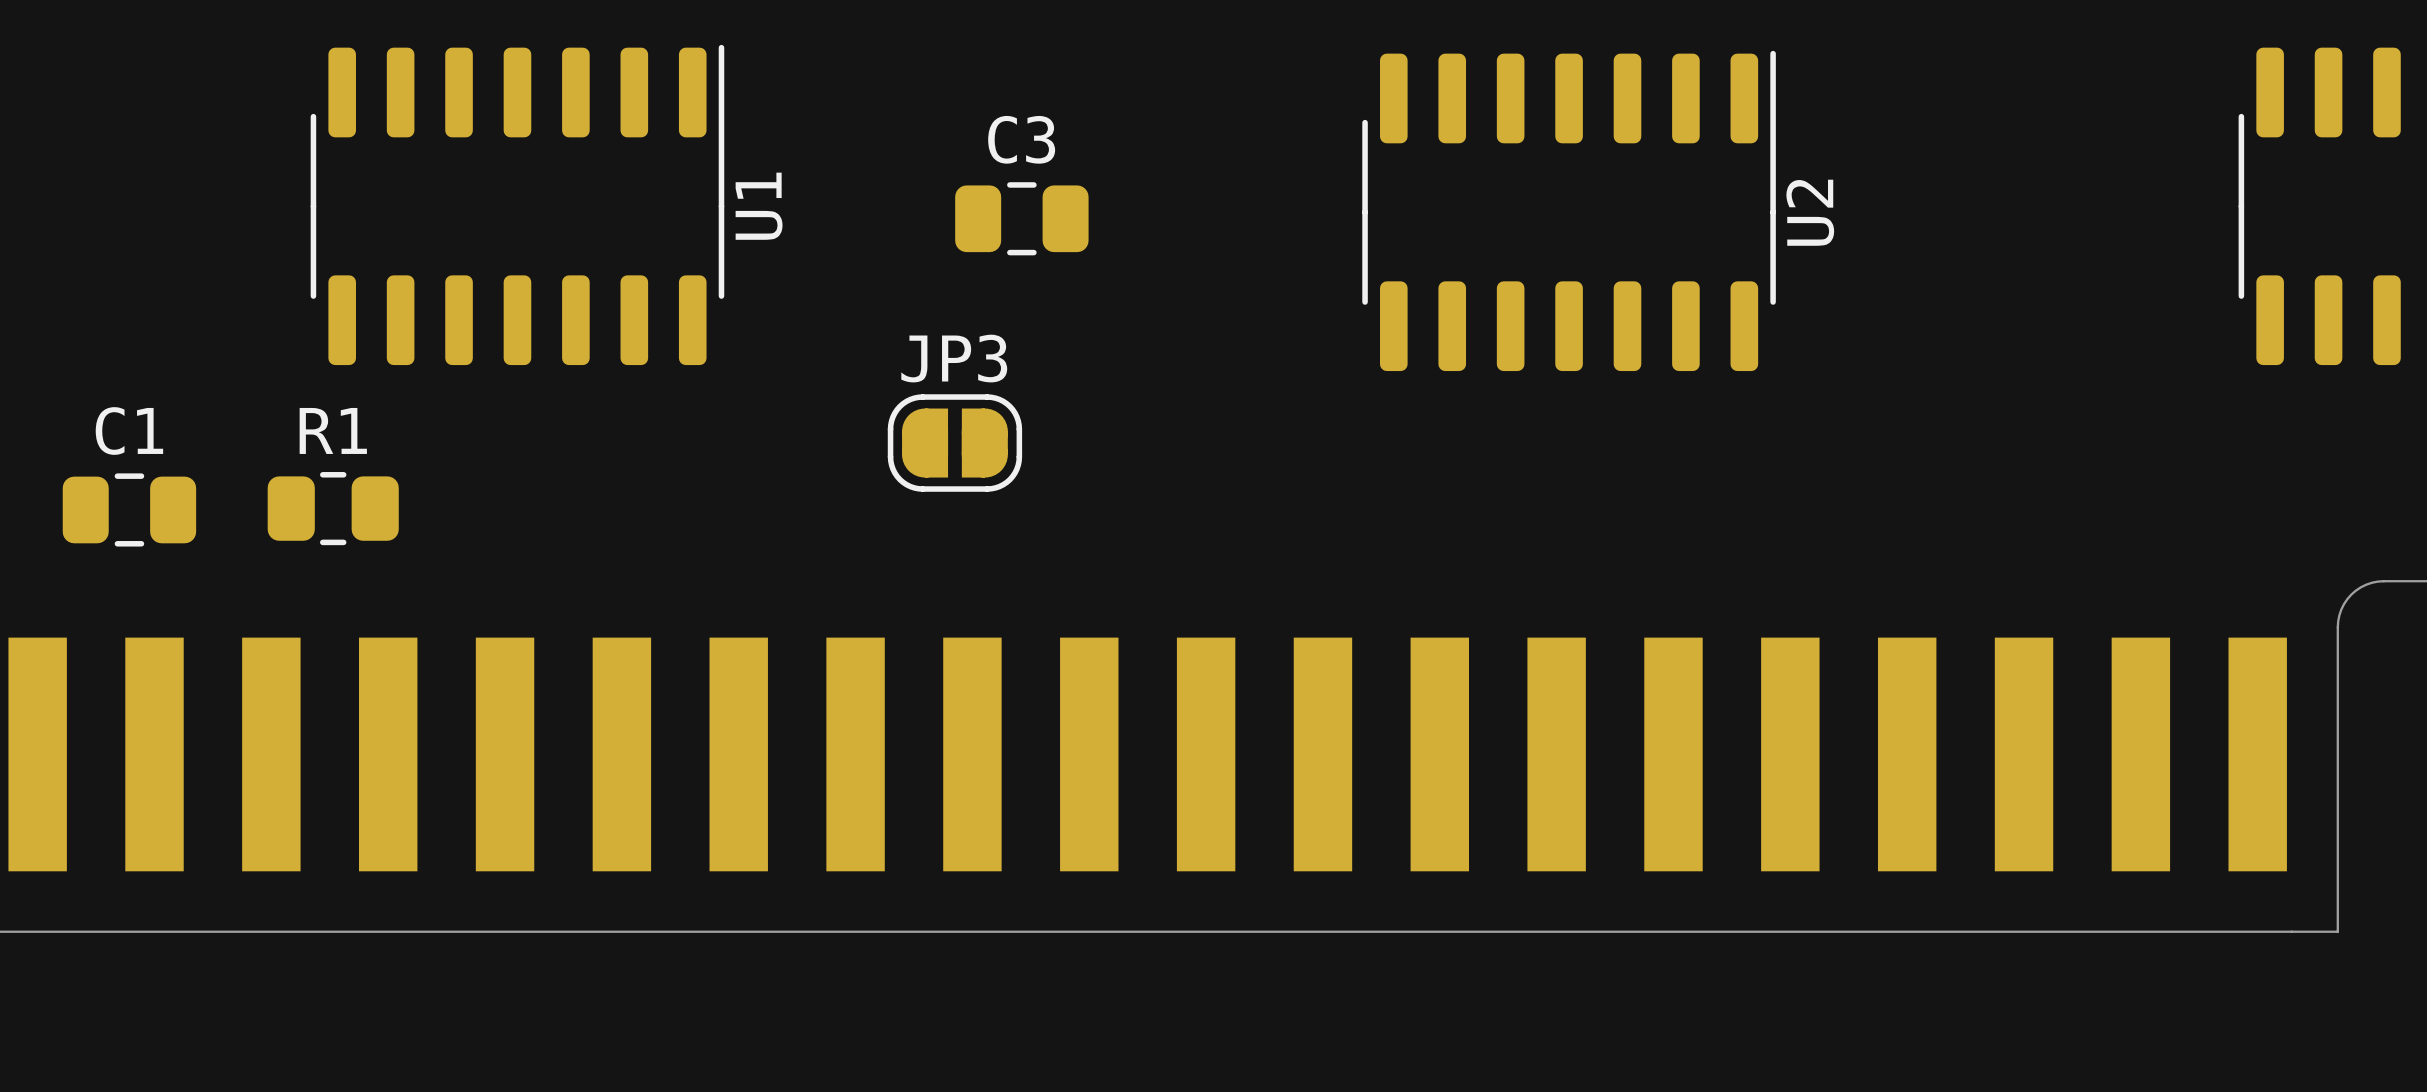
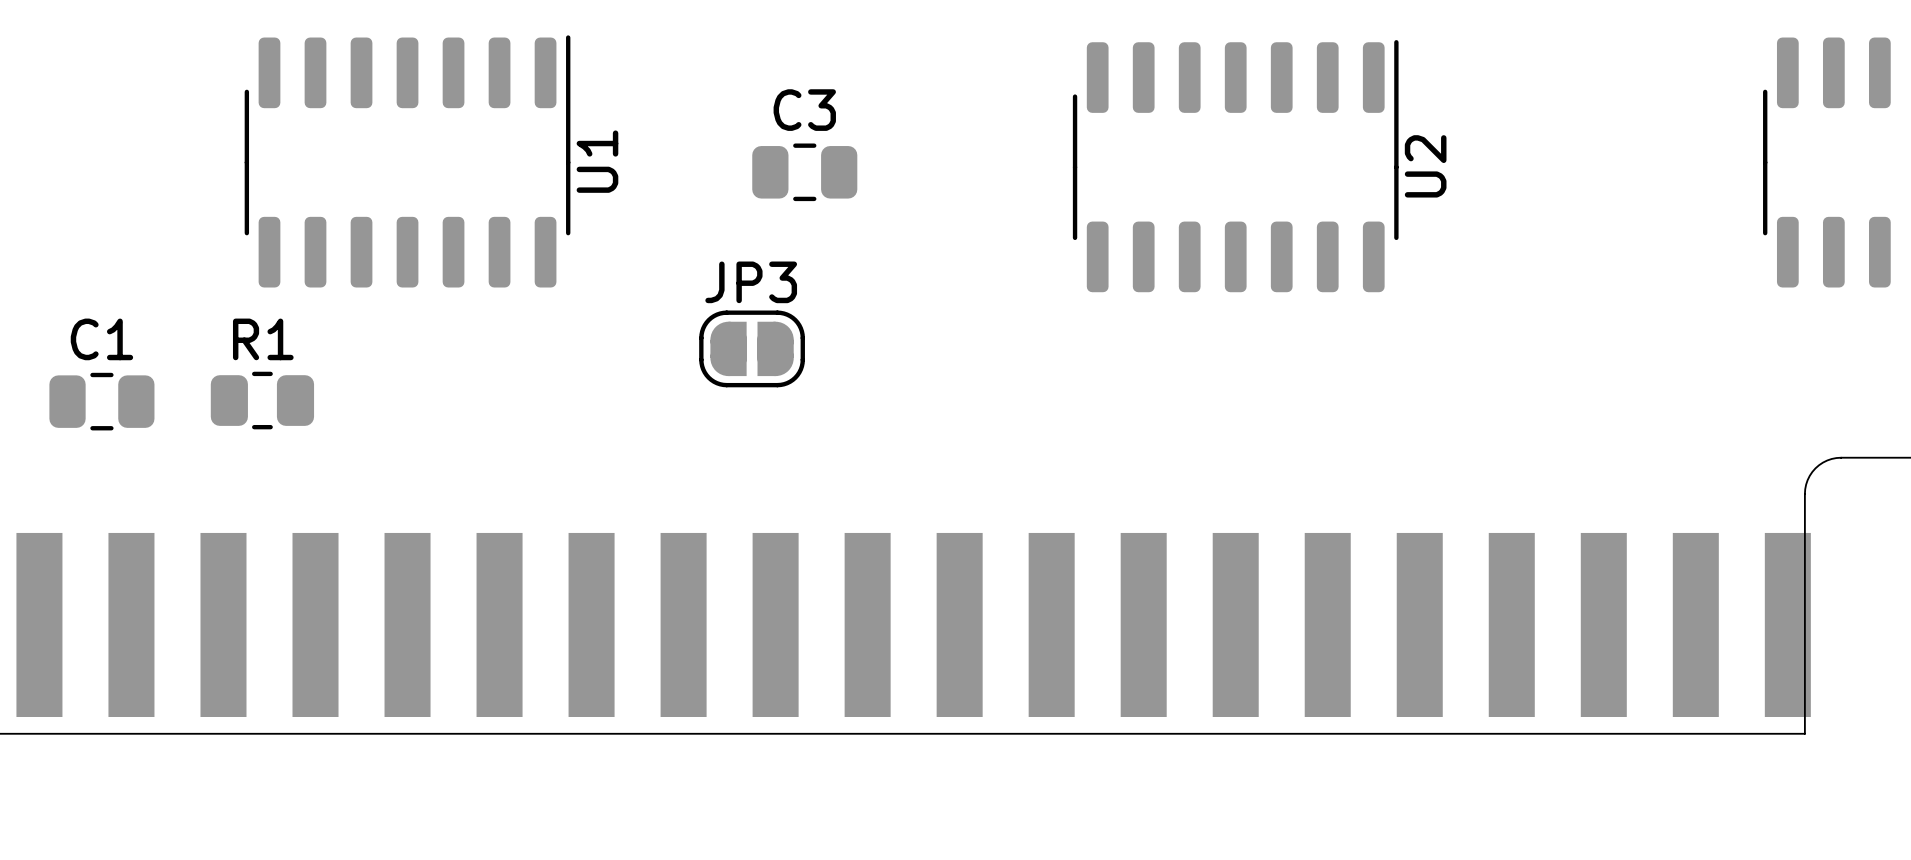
board edge: (2383, 581) (2366, 584) (2351, 594) (2343, 604) (2338, 621) (2337, 931) (2291, 931) -> (1877, 457) (1841, 457) (1827, 460) (1812, 471) (1806, 484) (1804, 733)
part position: (1147, 754) -> (913, 624)

